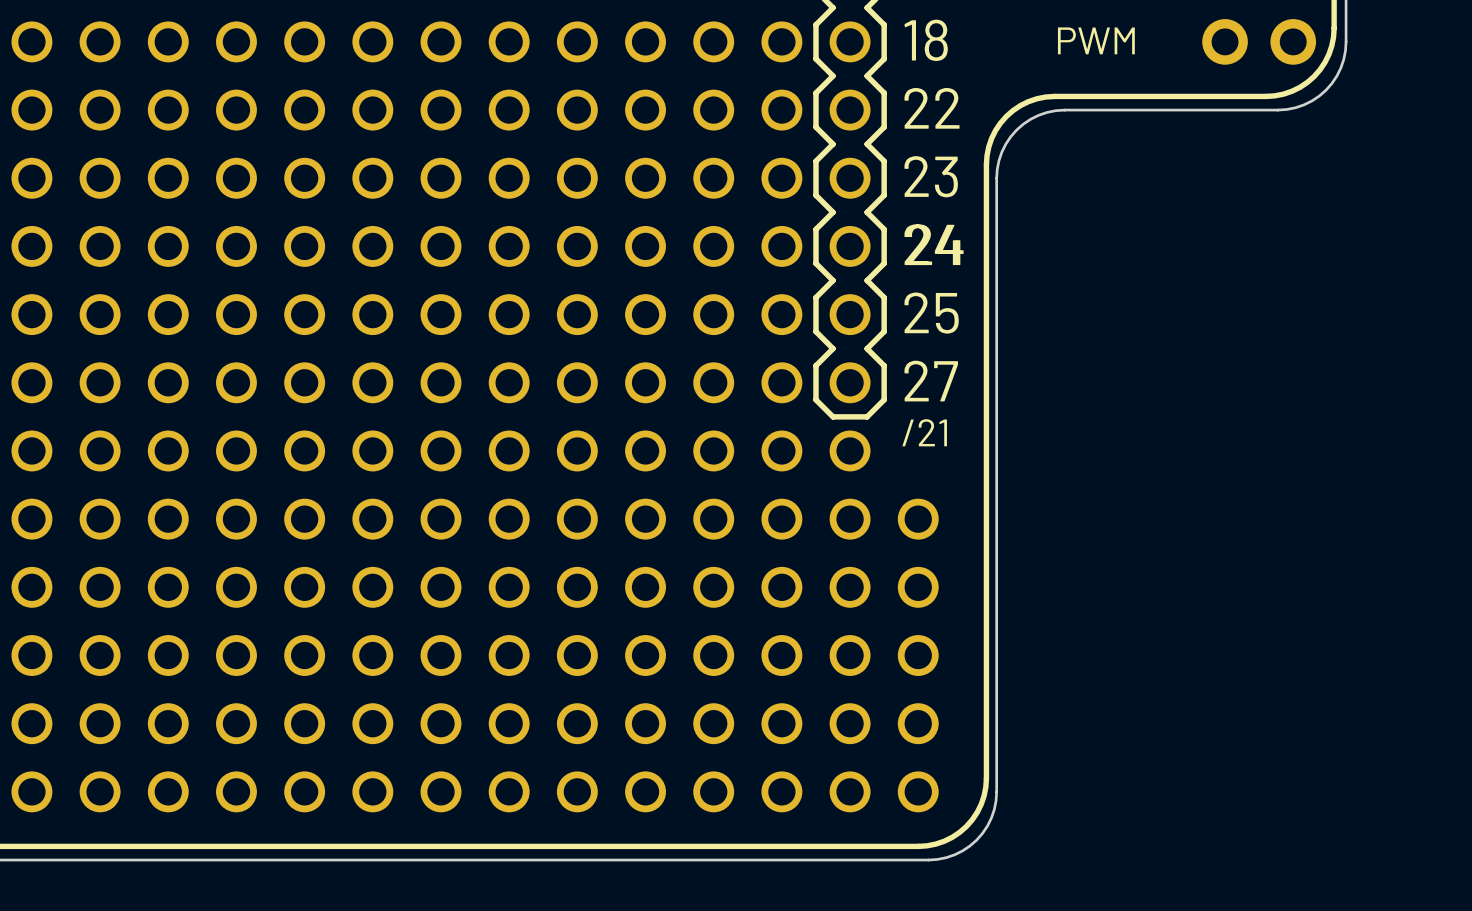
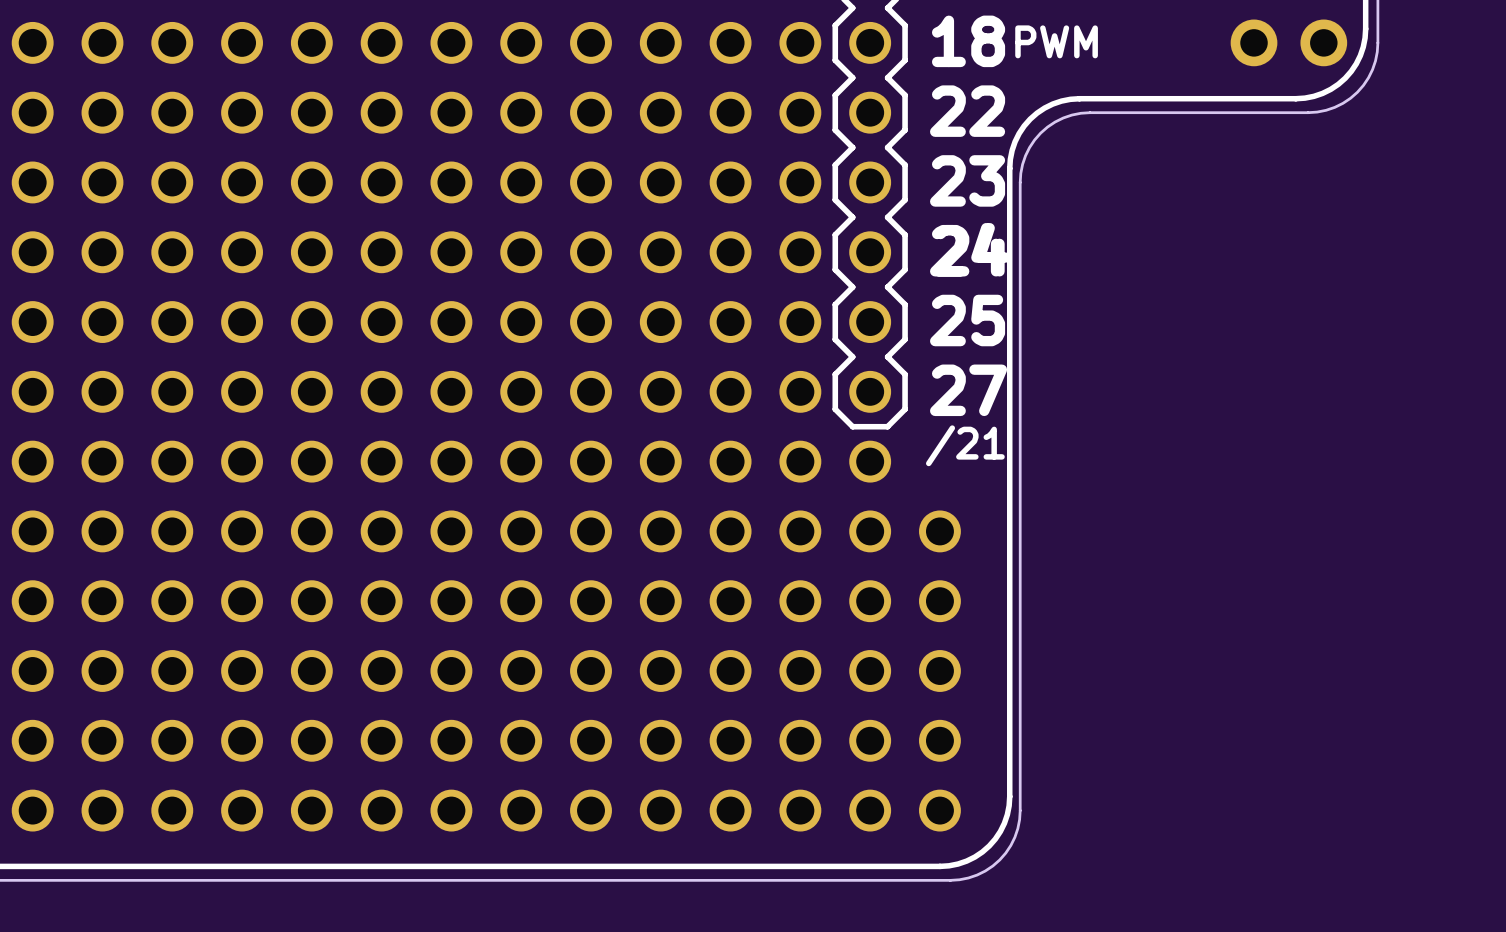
text position: PWM (1096, 40) -> PWM (1056, 41)

